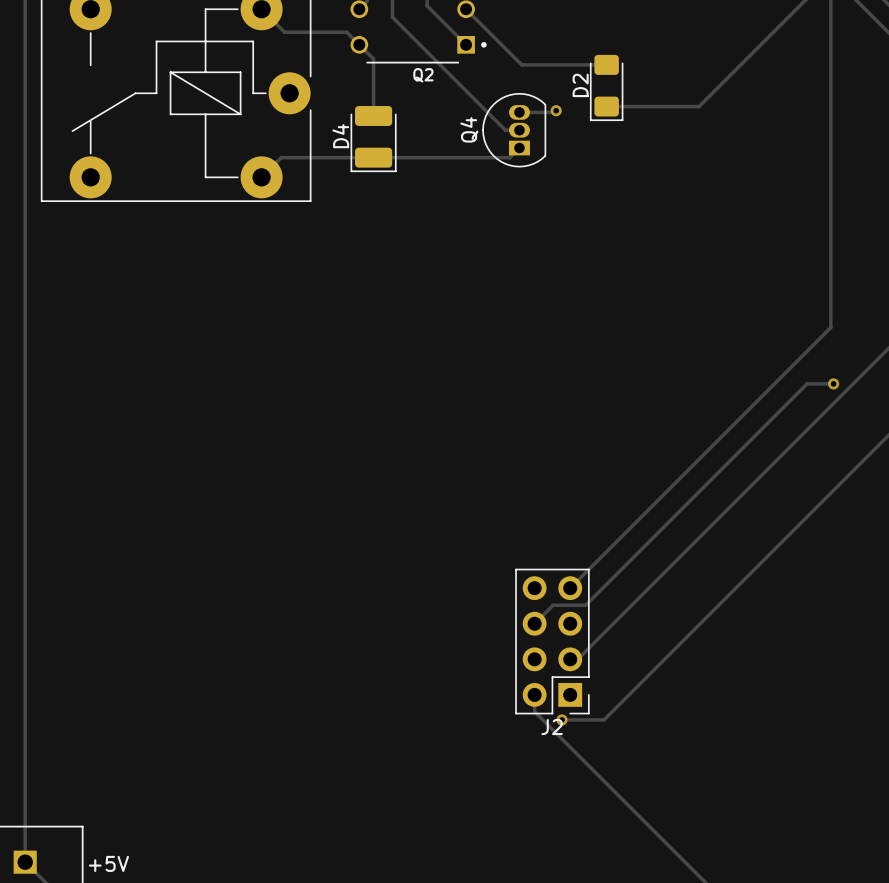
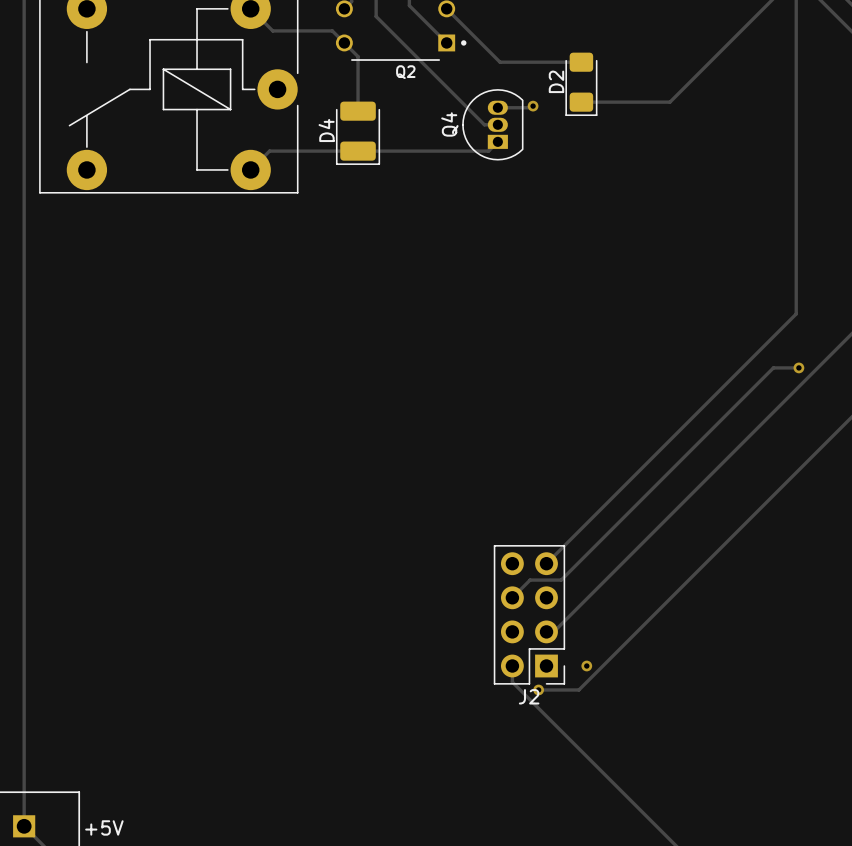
via: none -> (586, 666)

